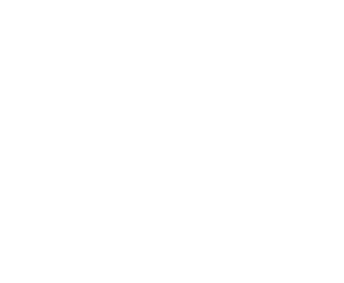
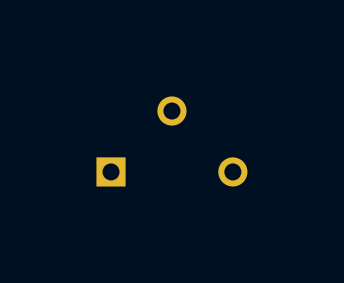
part: none -> (171, 141)

